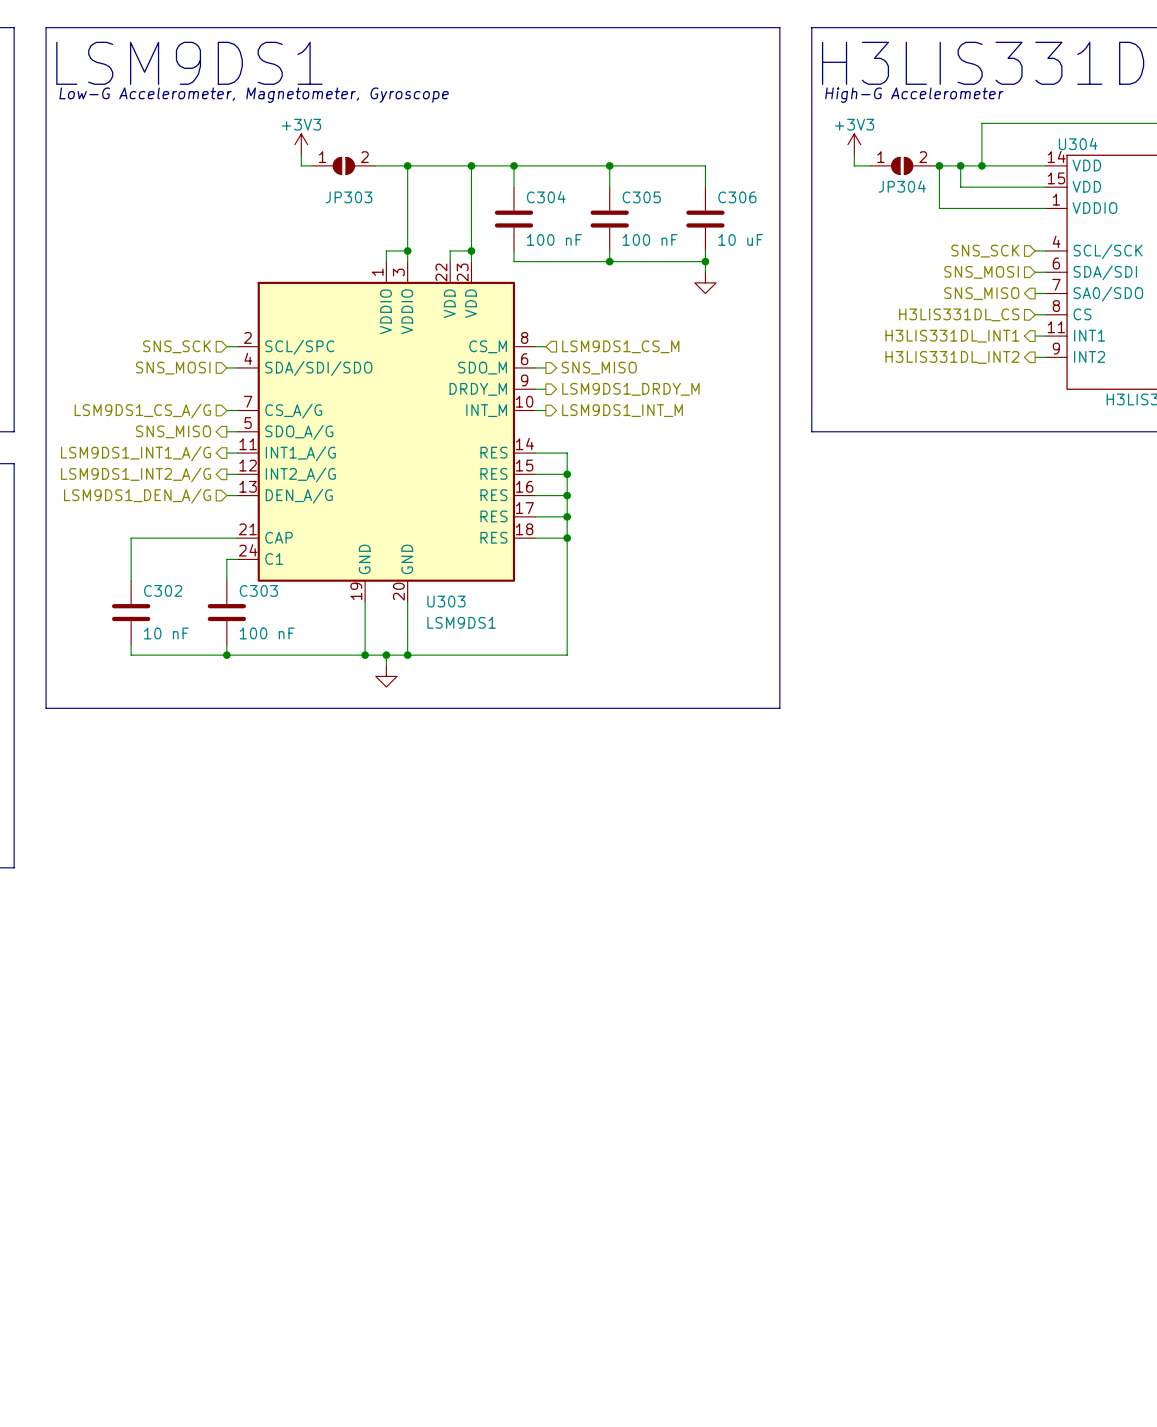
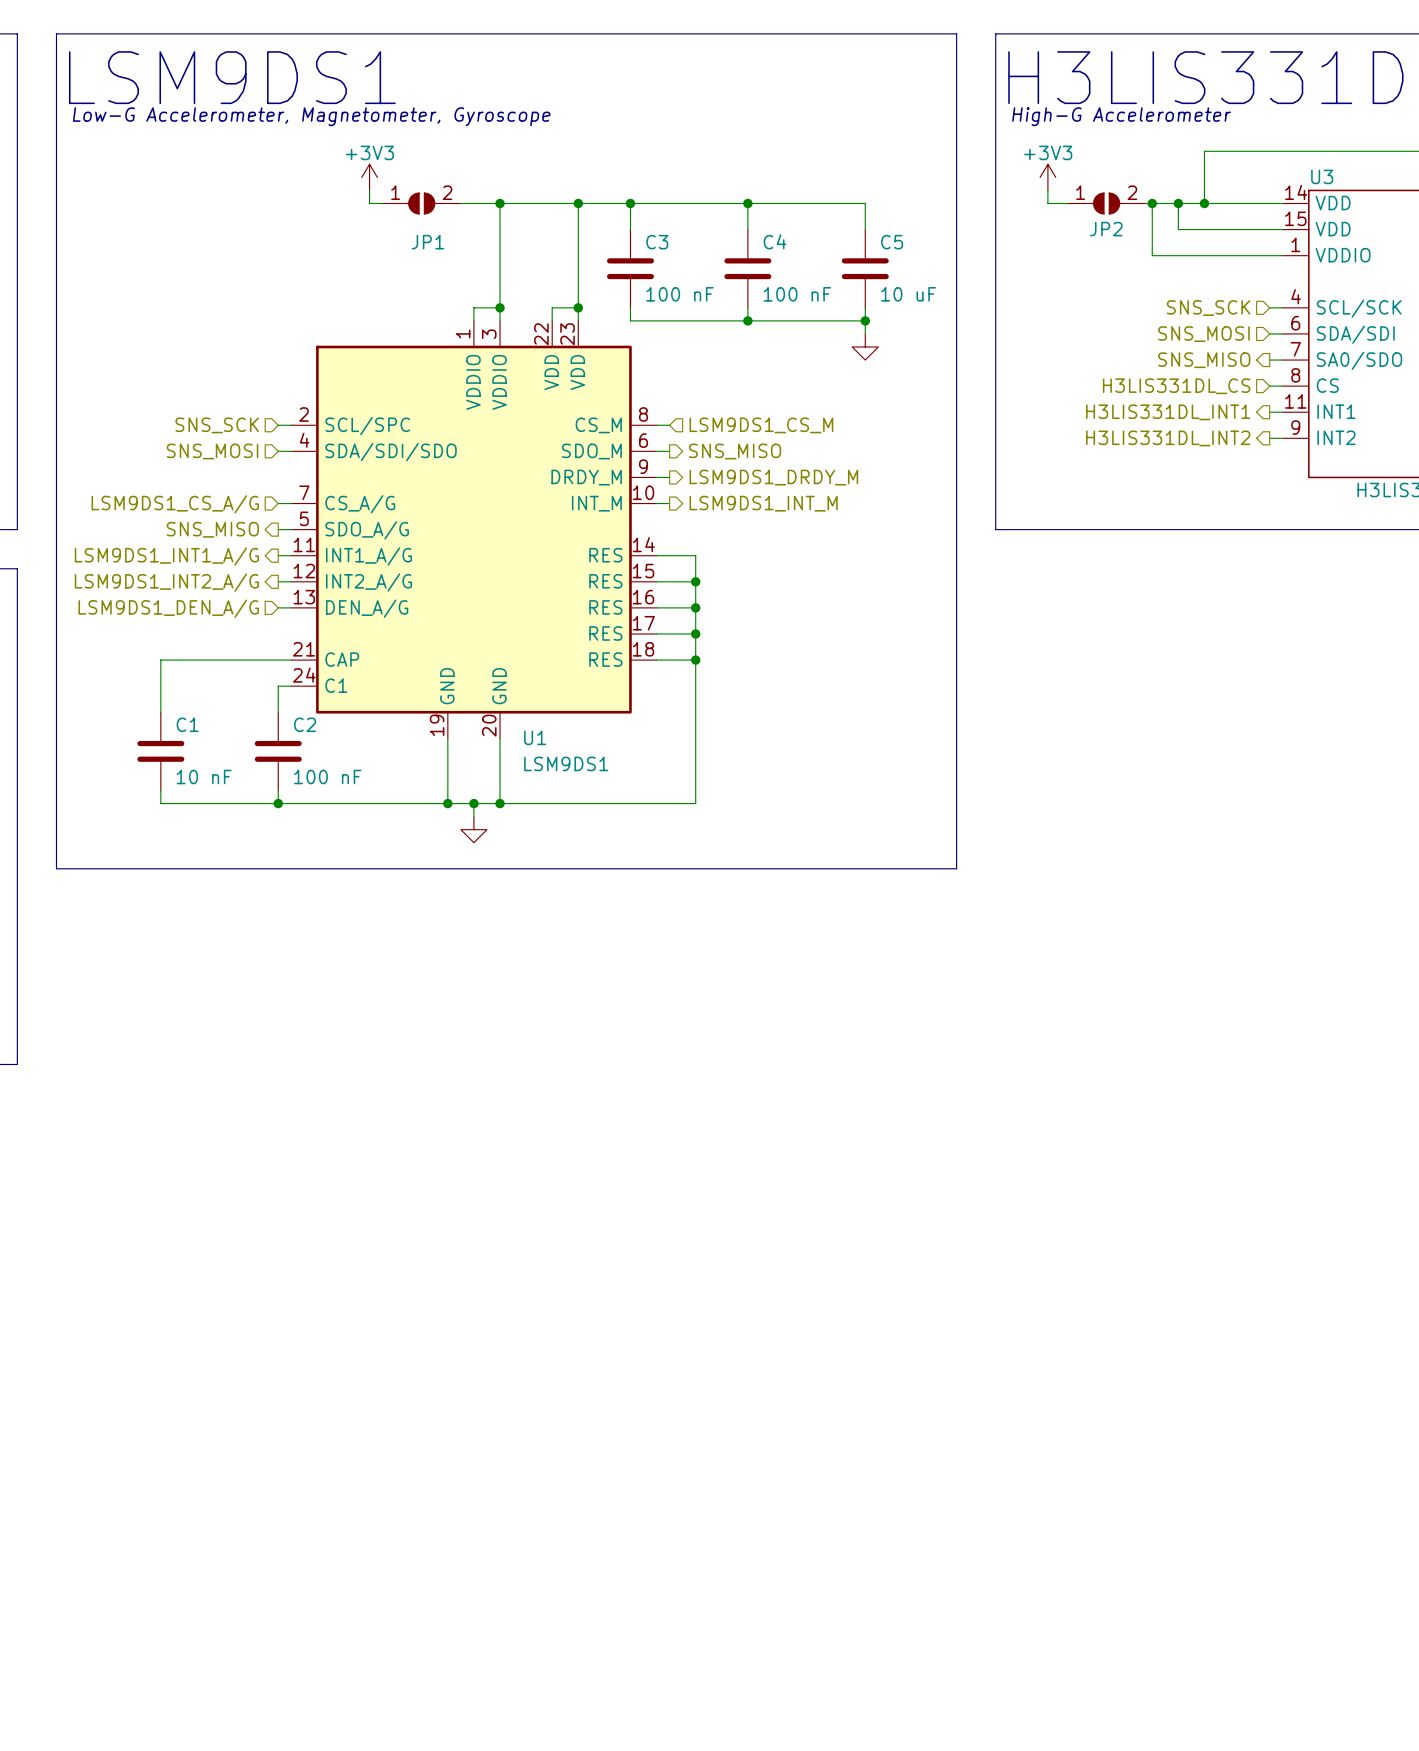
U304 name: U304 (1078, 143) -> U3 (1322, 176)
JP304 name: JP304 (902, 186) -> JP2 (1106, 229)
JP303 name: JP303 (348, 197) -> JP1 (427, 242)
C304 name: C304 (546, 197) -> C3 (657, 242)
C305 name: C305 (641, 197) -> C4 (775, 241)
C306 name: C306 (737, 197) -> C5 (892, 242)
C302 name: C302 (163, 590) -> C1 (187, 724)
C303 name: C303 (258, 590) -> C2 (305, 724)
U303 name: U303 (446, 601) -> U1 (535, 737)

